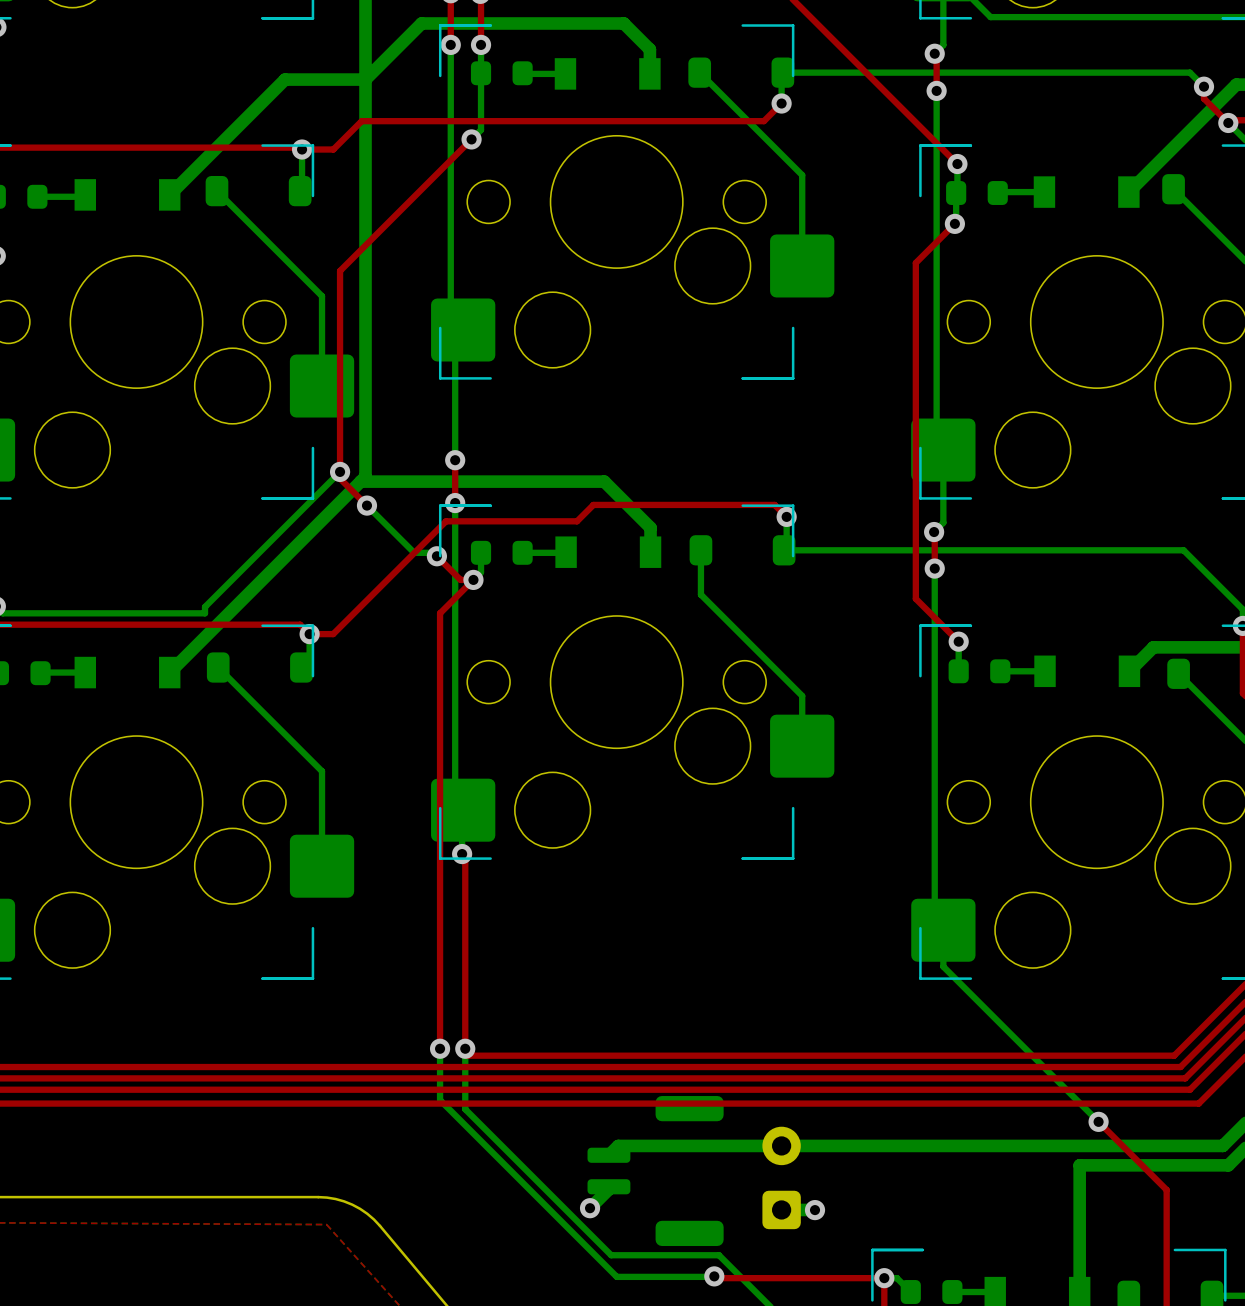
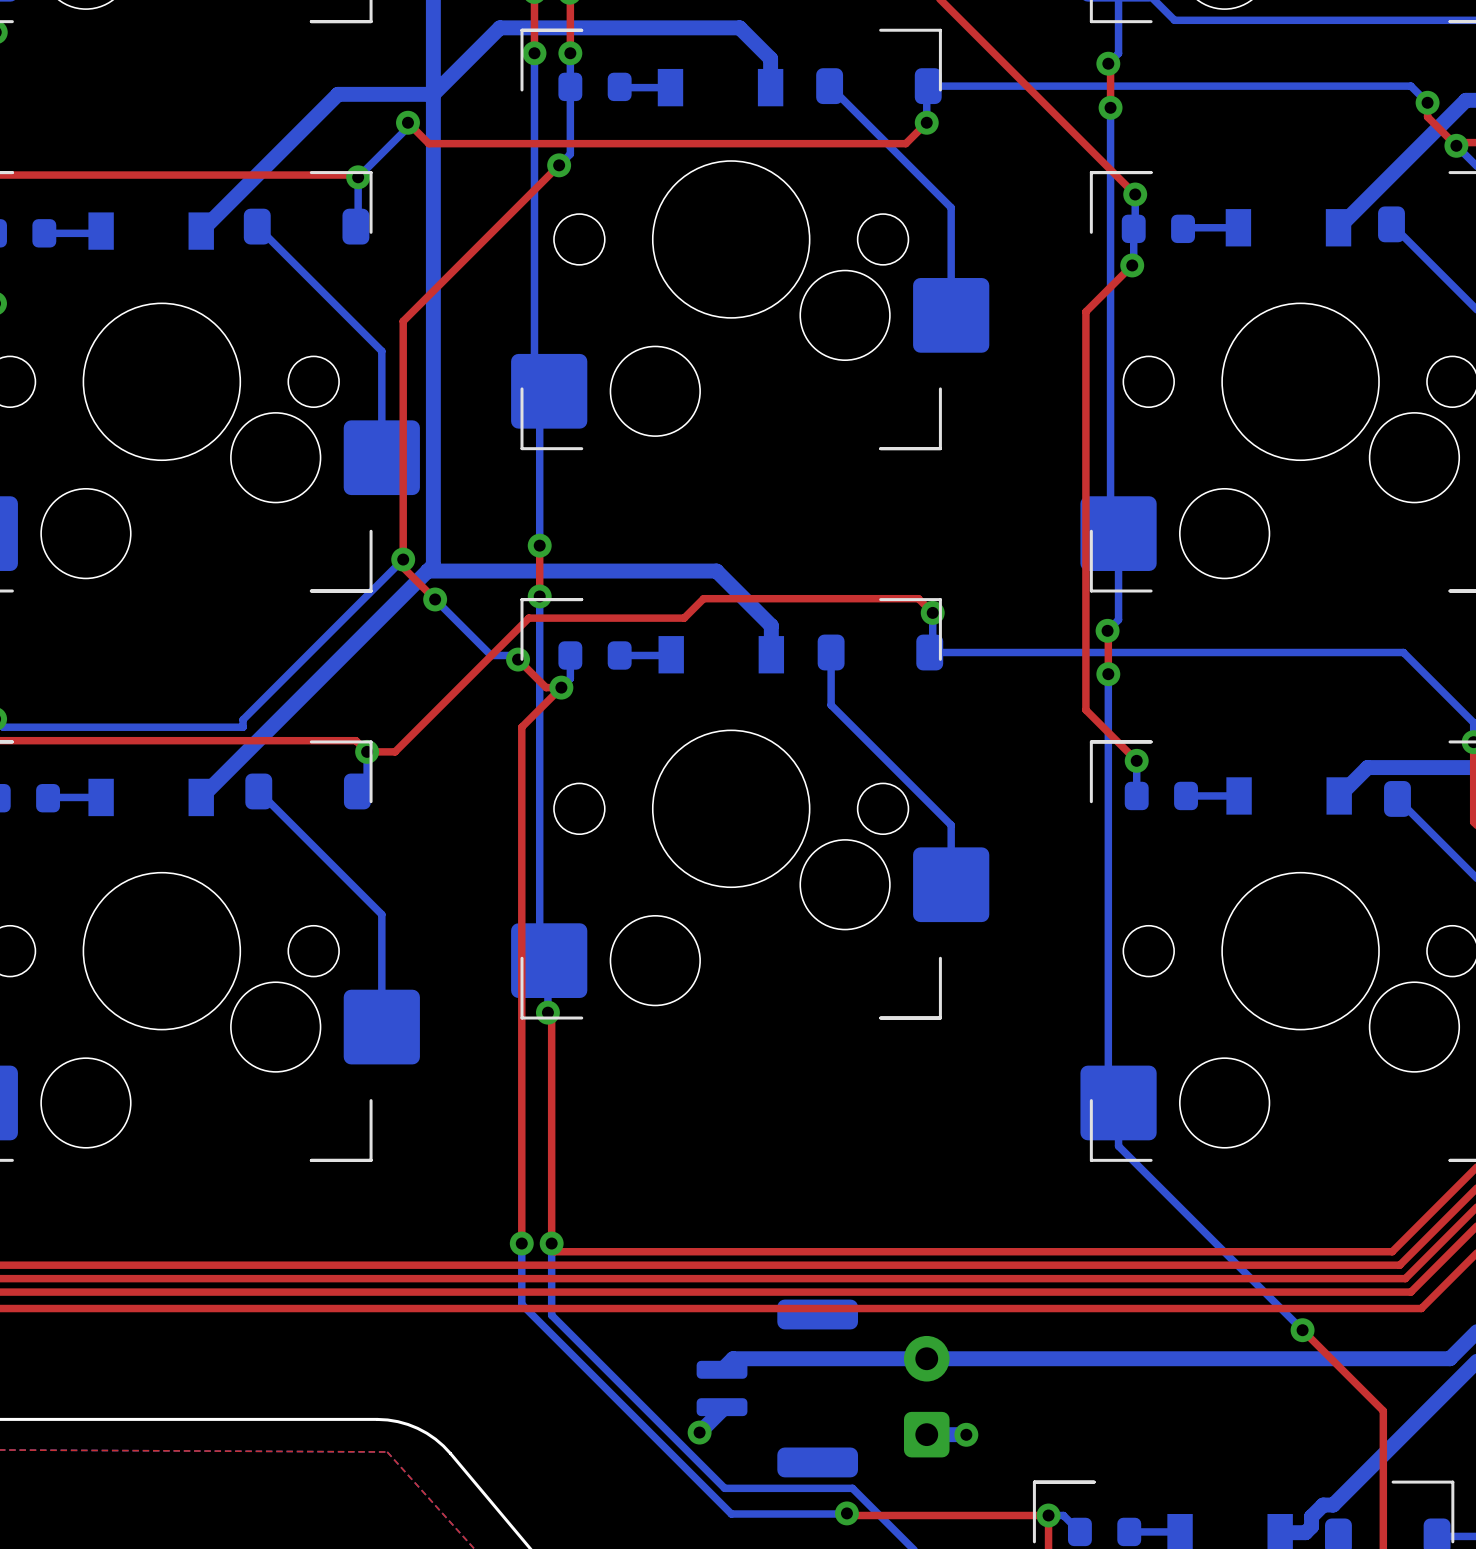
bottom track: none -> (407, 122) (407, 127) (358, 177)
via: none -> (407, 122)
top track: (361, 121) (333, 149) (302, 149) -> (428, 143) (407, 122)
bottom track: (1228, 1165) (1079, 1165) (1079, 1292) -> (1456, 1381) (1333, 1505) (1323, 1505) (1311, 1516) (1311, 1526) (1305, 1532) (1280, 1532)

